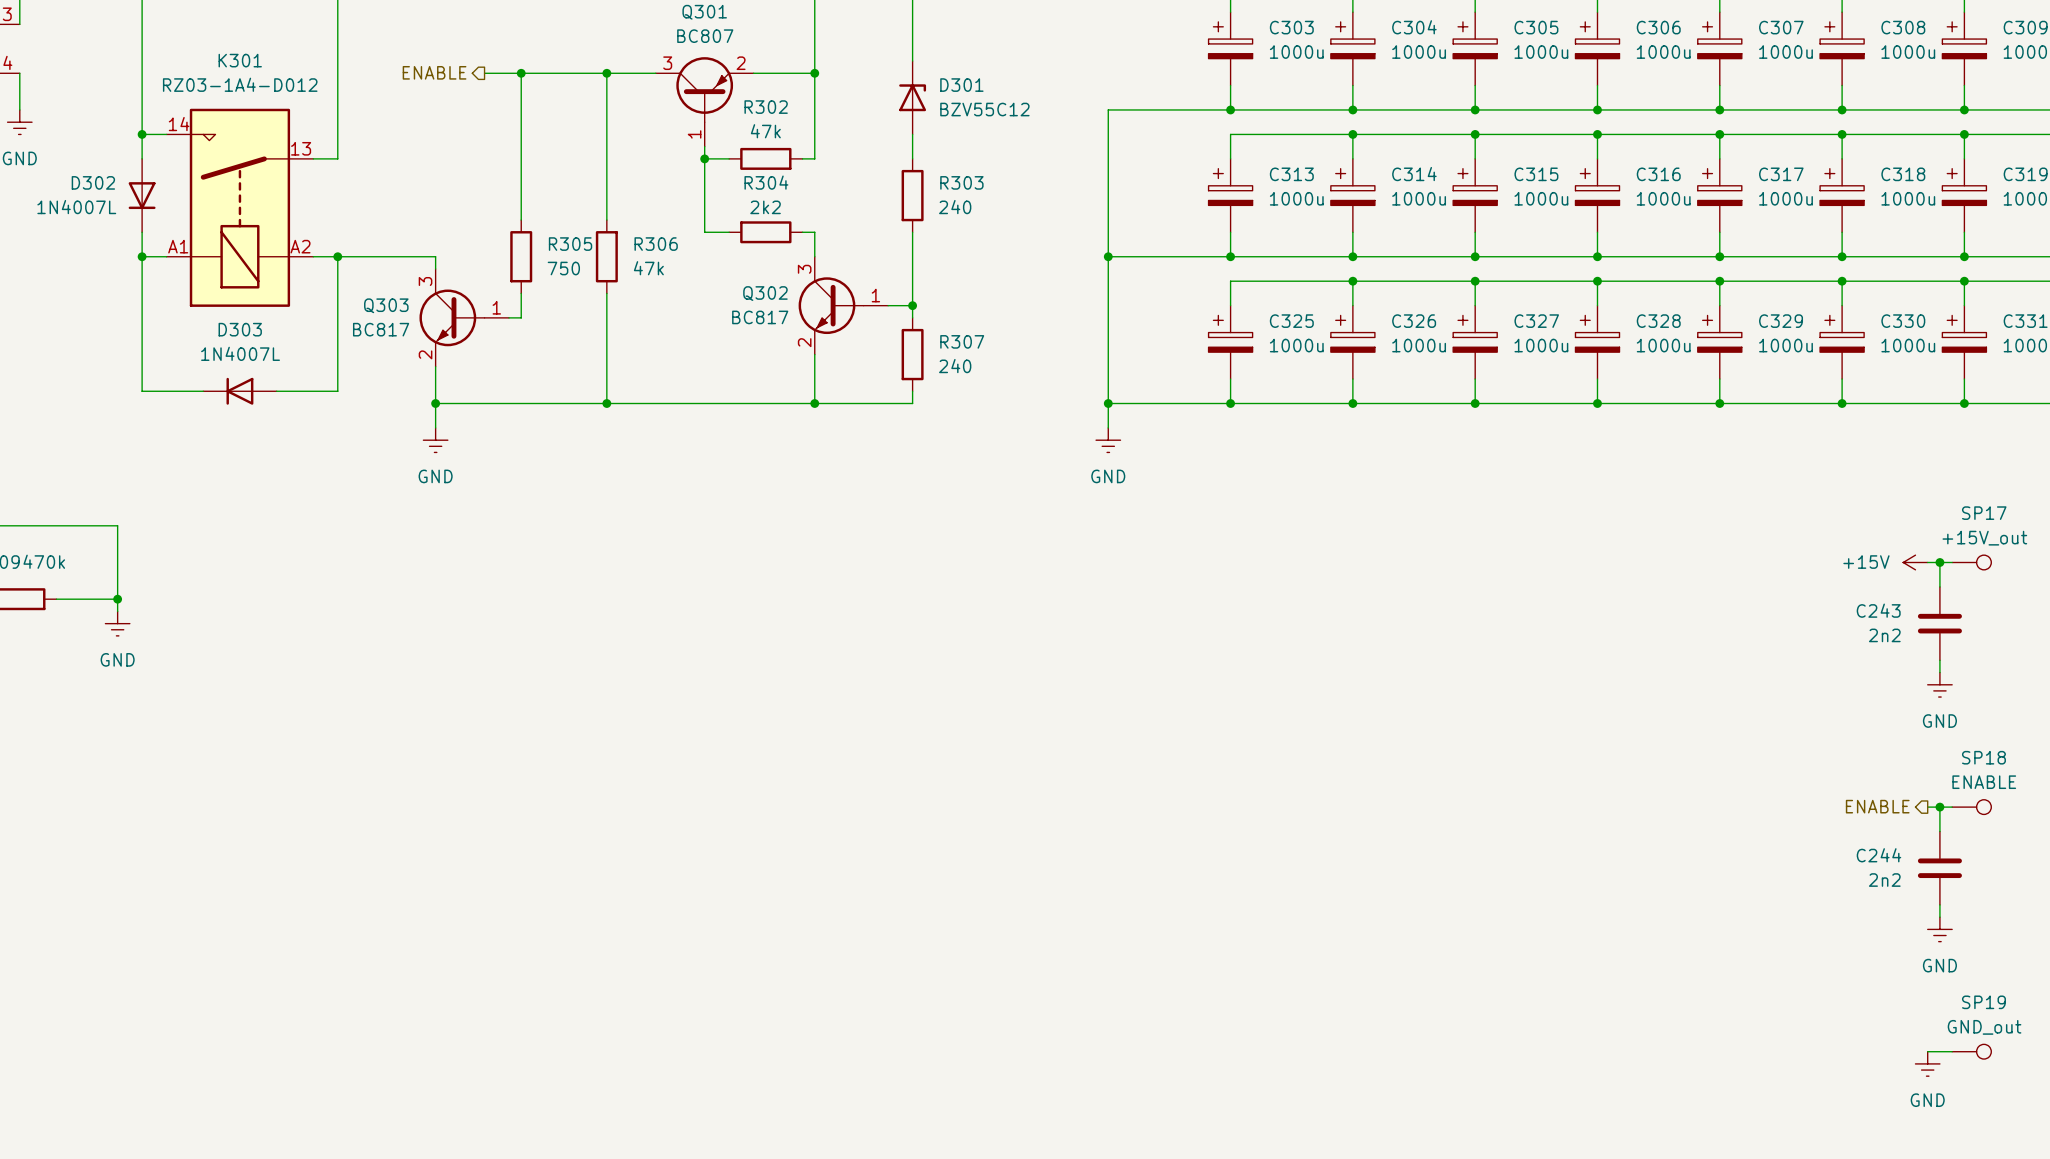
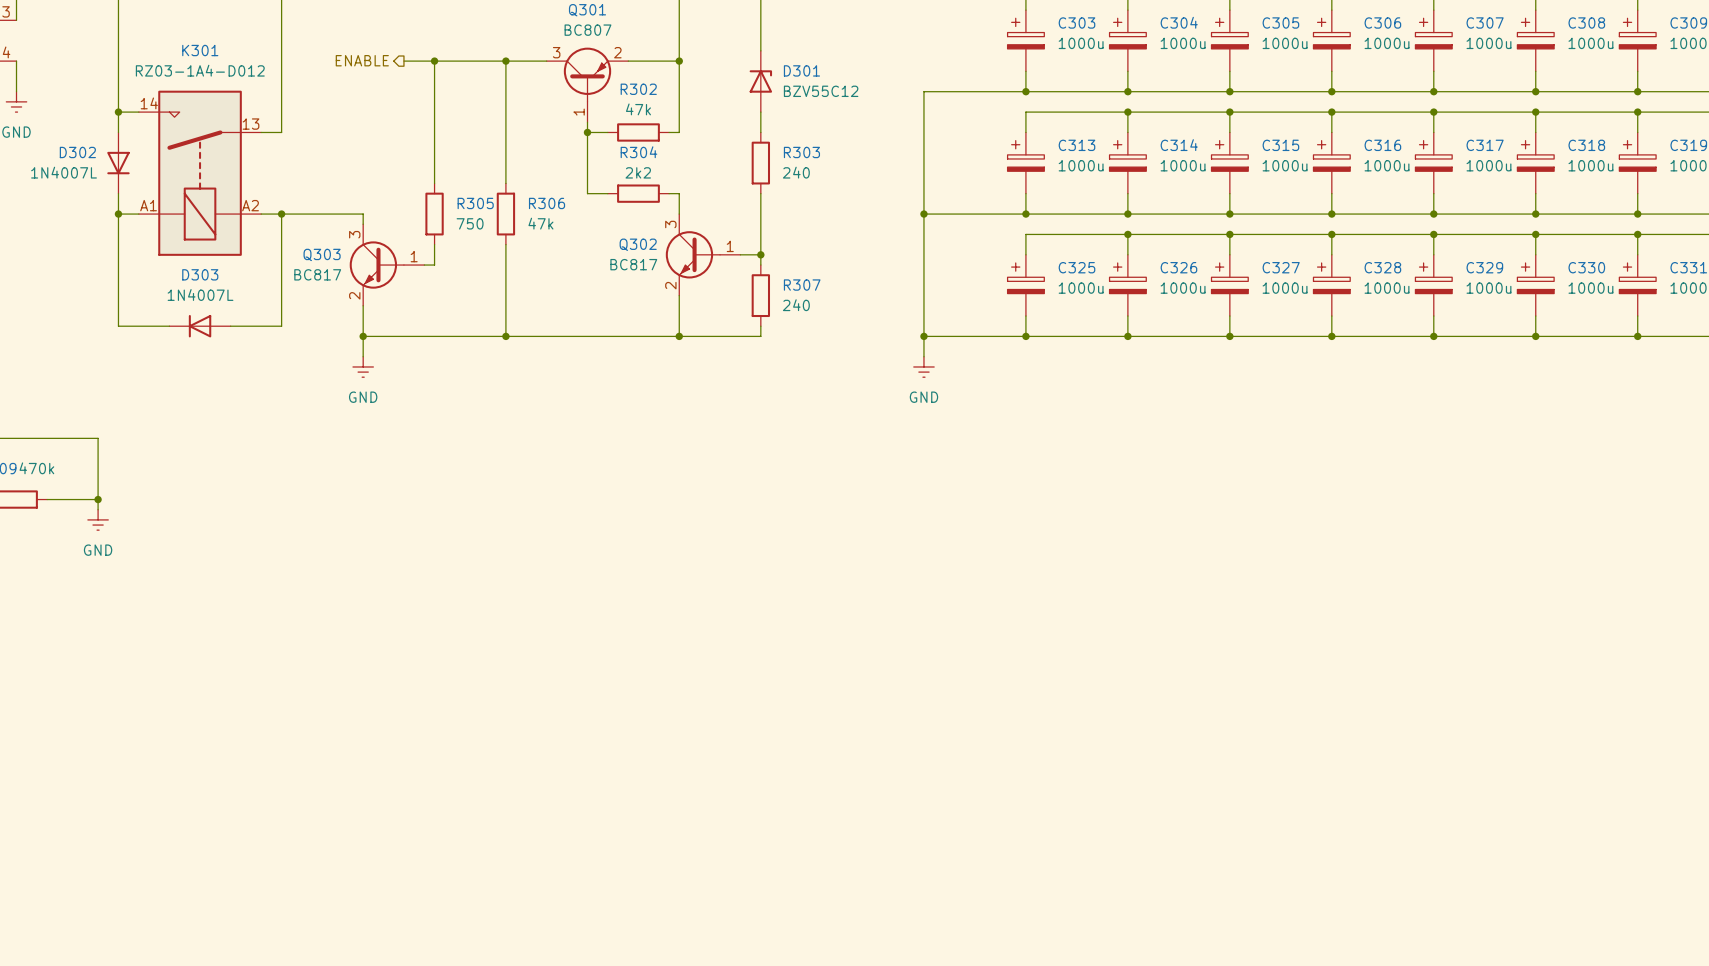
power symbol: +15V (1915, 562) -> none
wire: (1927, 562) (1952, 562) -> none
wire: (1939, 562) (1939, 586) -> none
junction: (1939, 562) -> none
SP17: +15V_out (1971, 562) -> none
C243: 2n2 (1939, 623) -> none
wire: (1939, 660) (1939, 672) -> none
power symbol: GND (1939, 684) -> none
hierarchical label: ENABLE (1877, 806) -> none
wire: (1927, 807) (1952, 807) -> none
wire: (1939, 807) (1939, 831) -> none
junction: (1939, 807) -> none
SP18: ENABLE (1971, 807) -> none
C244: 2n2 (1939, 868) -> none
wire: (1939, 904) (1939, 917) -> none
power symbol: GND (1939, 929) -> none
wire: (1927, 1051) (1952, 1051) -> none
SP19: GND_out (1971, 1051) -> none
power symbol: GND (1927, 1063) -> none

